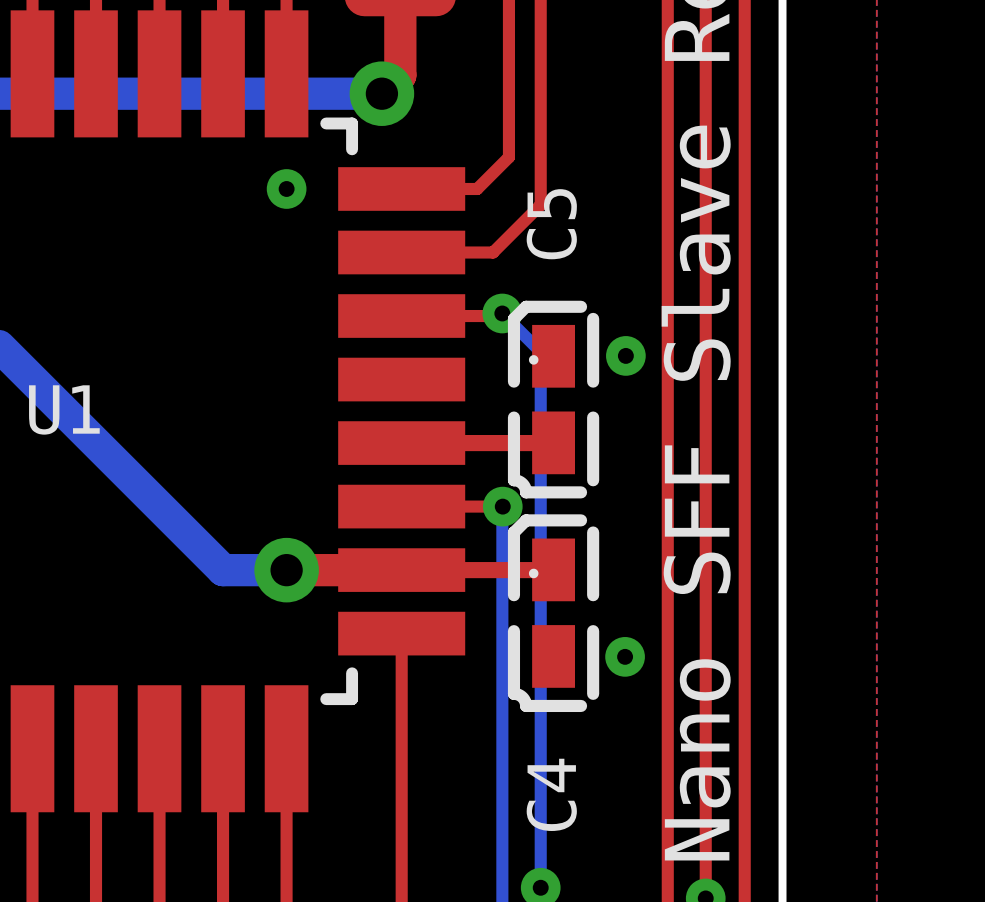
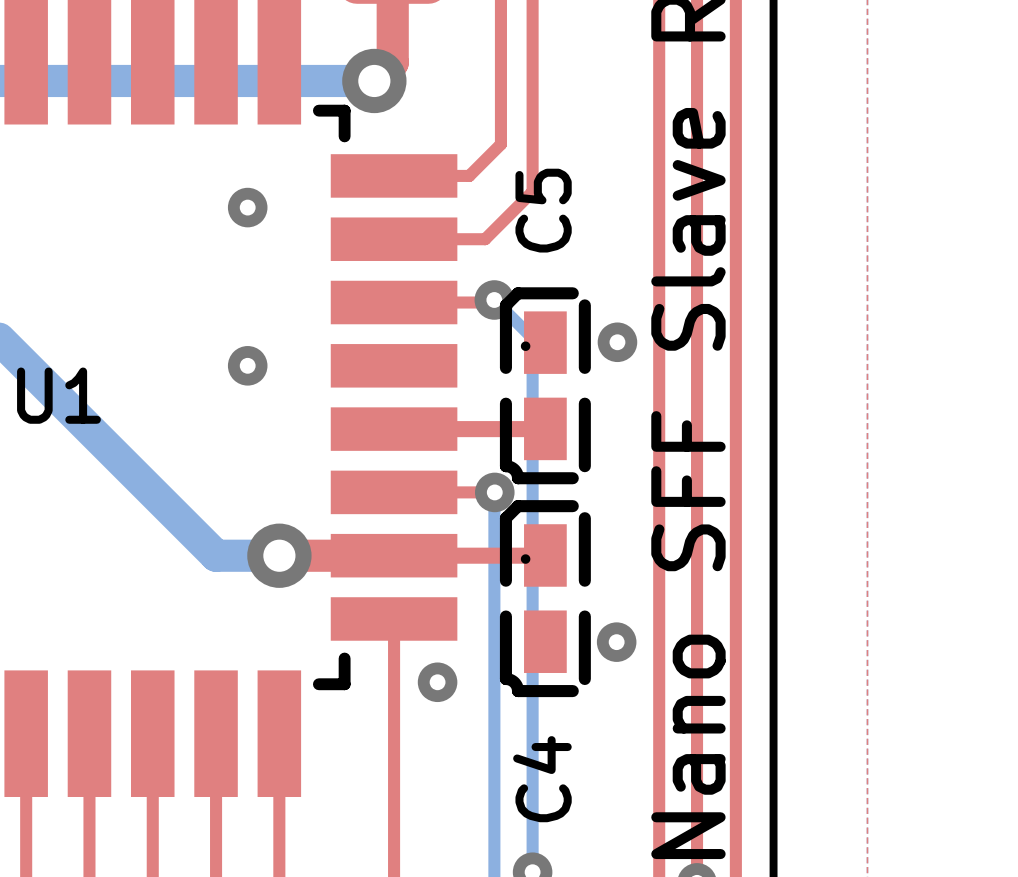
via position: (286, 188) -> (247, 207)
via: none -> (247, 365)
via: none -> (437, 682)

